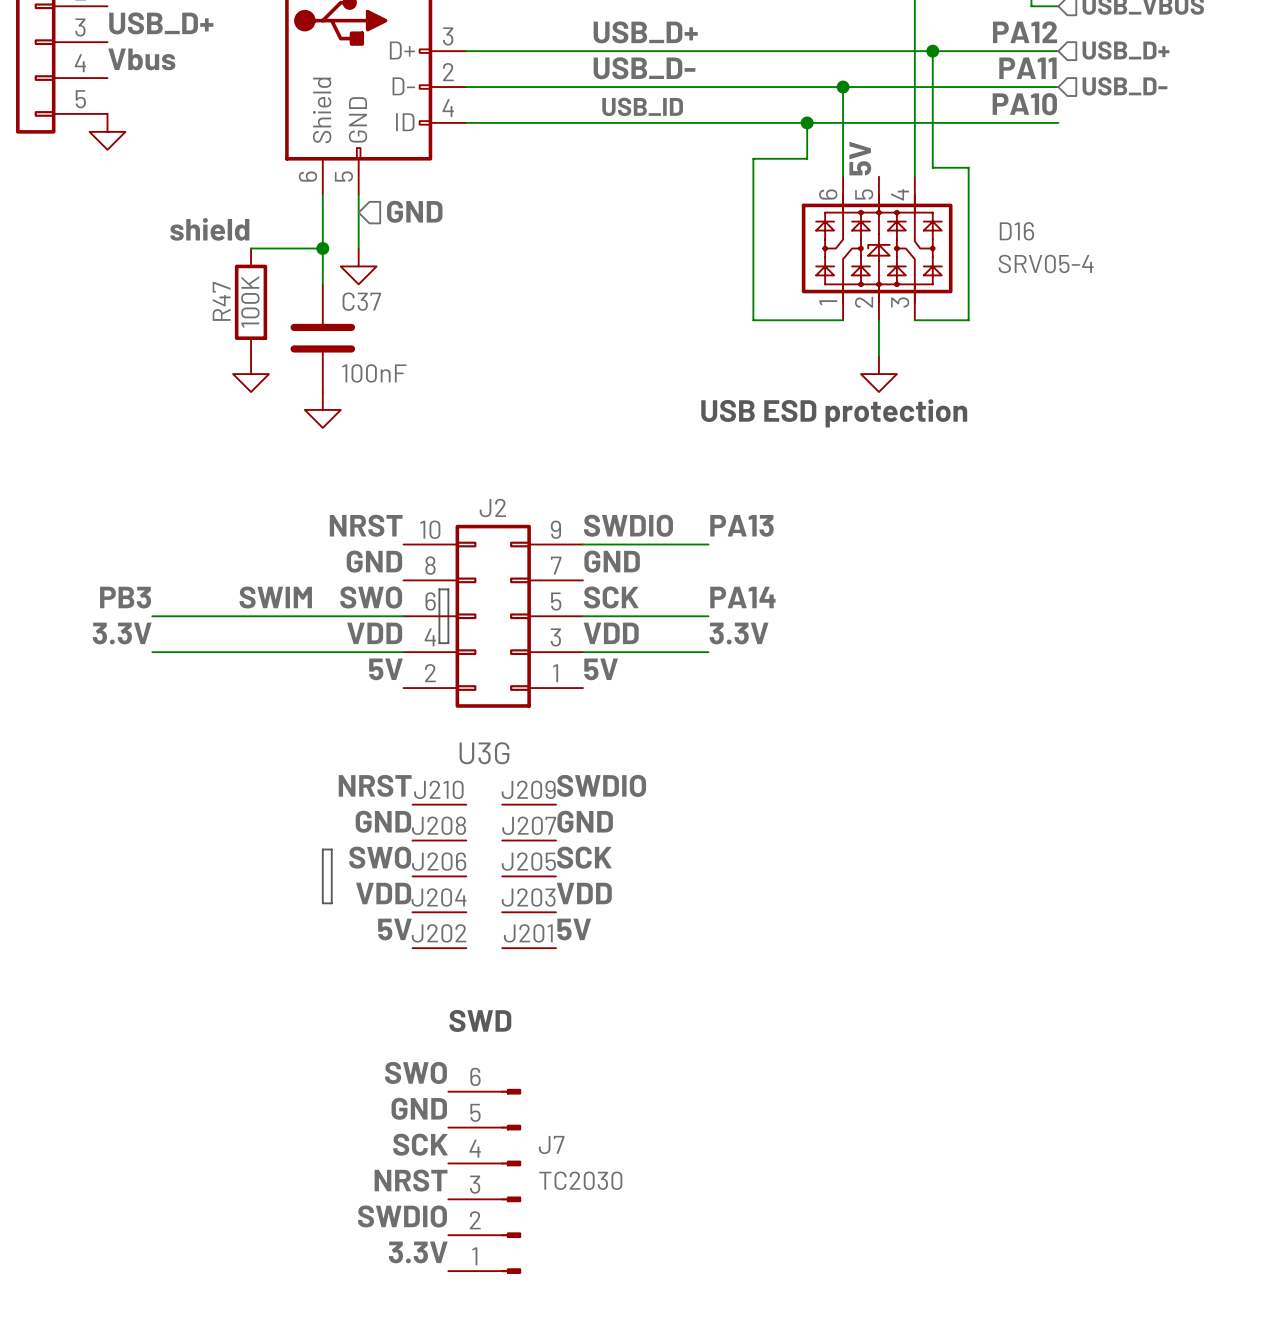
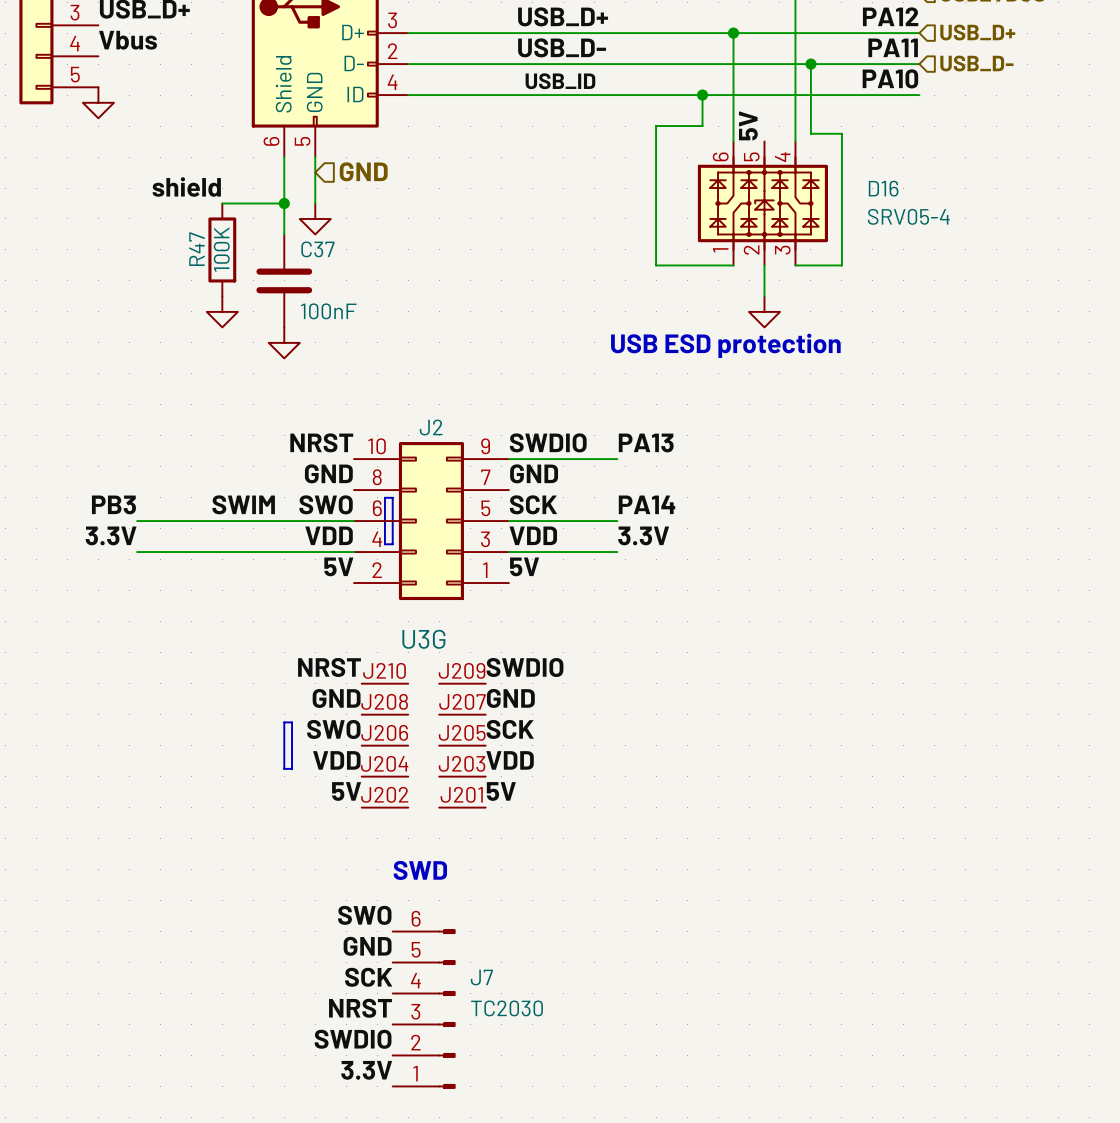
wire: (932, 51) (932, 87) -> (733, 33) (733, 64)
junction position: (932, 51) -> (810, 64)
junction position: (843, 87) -> (733, 33)

